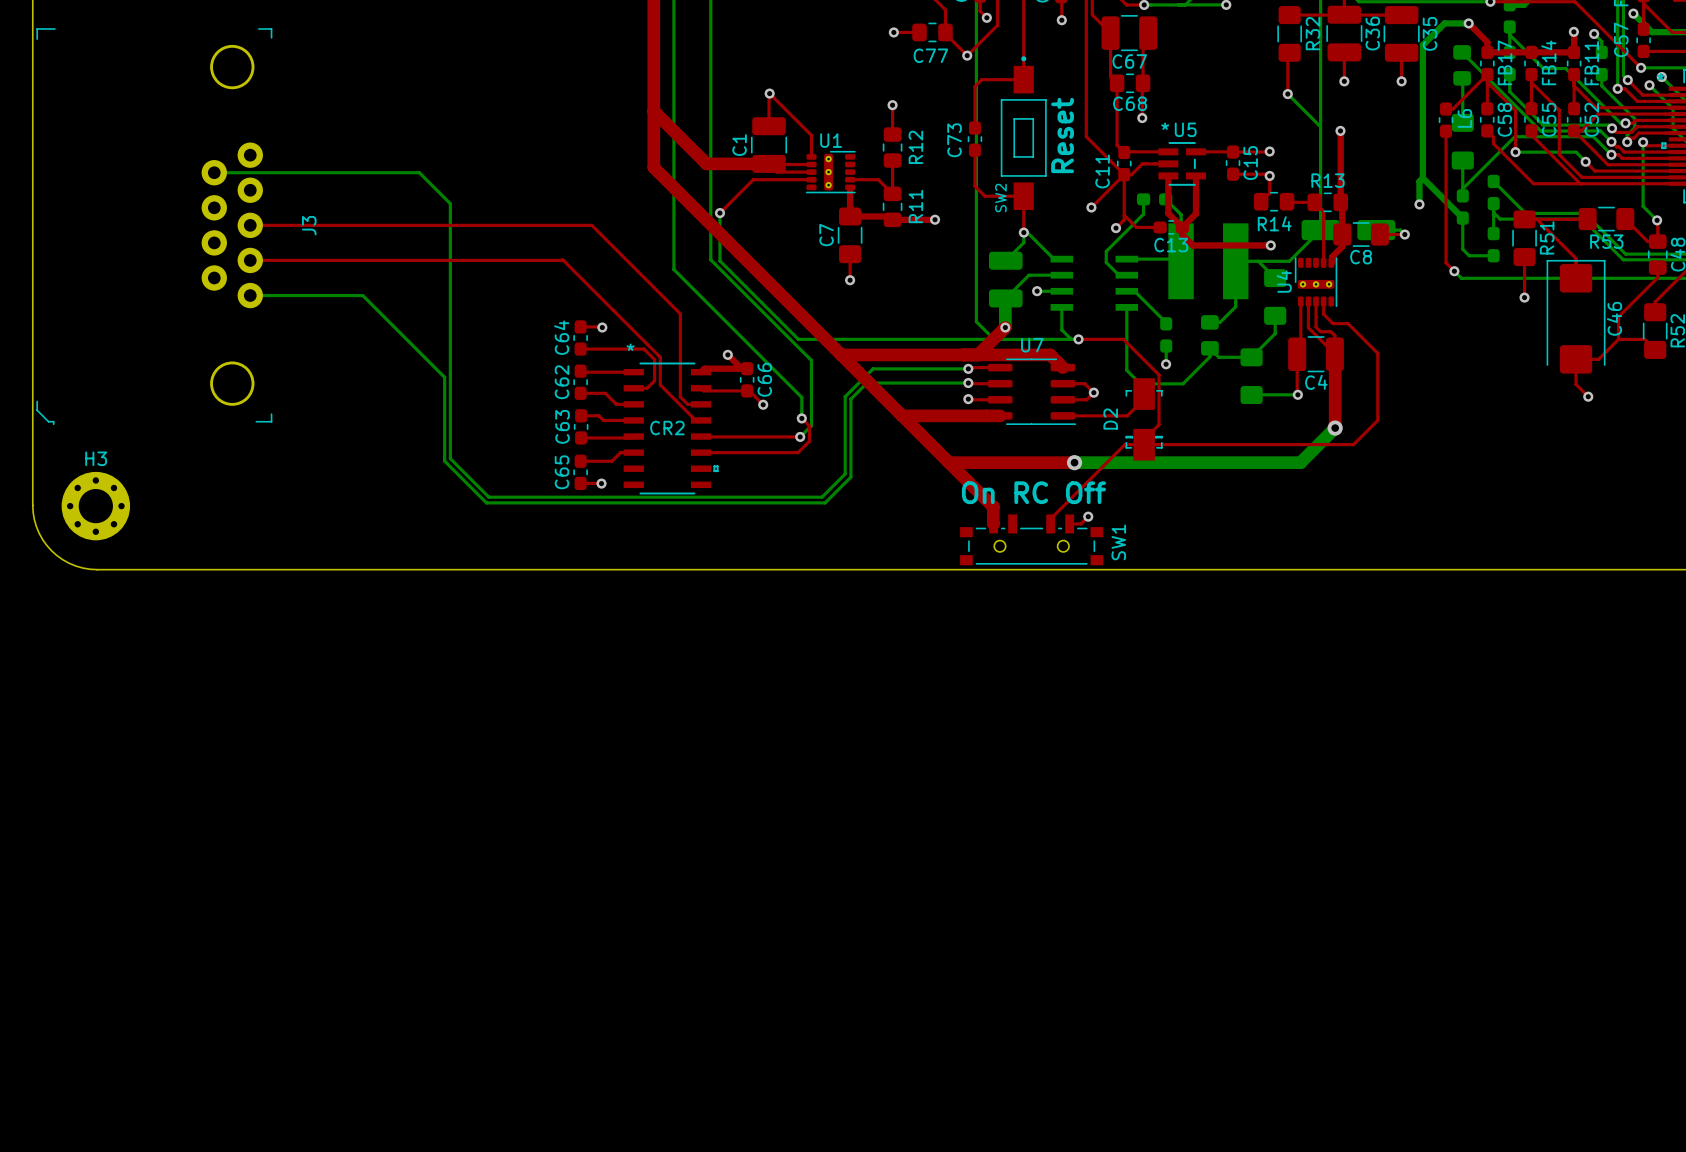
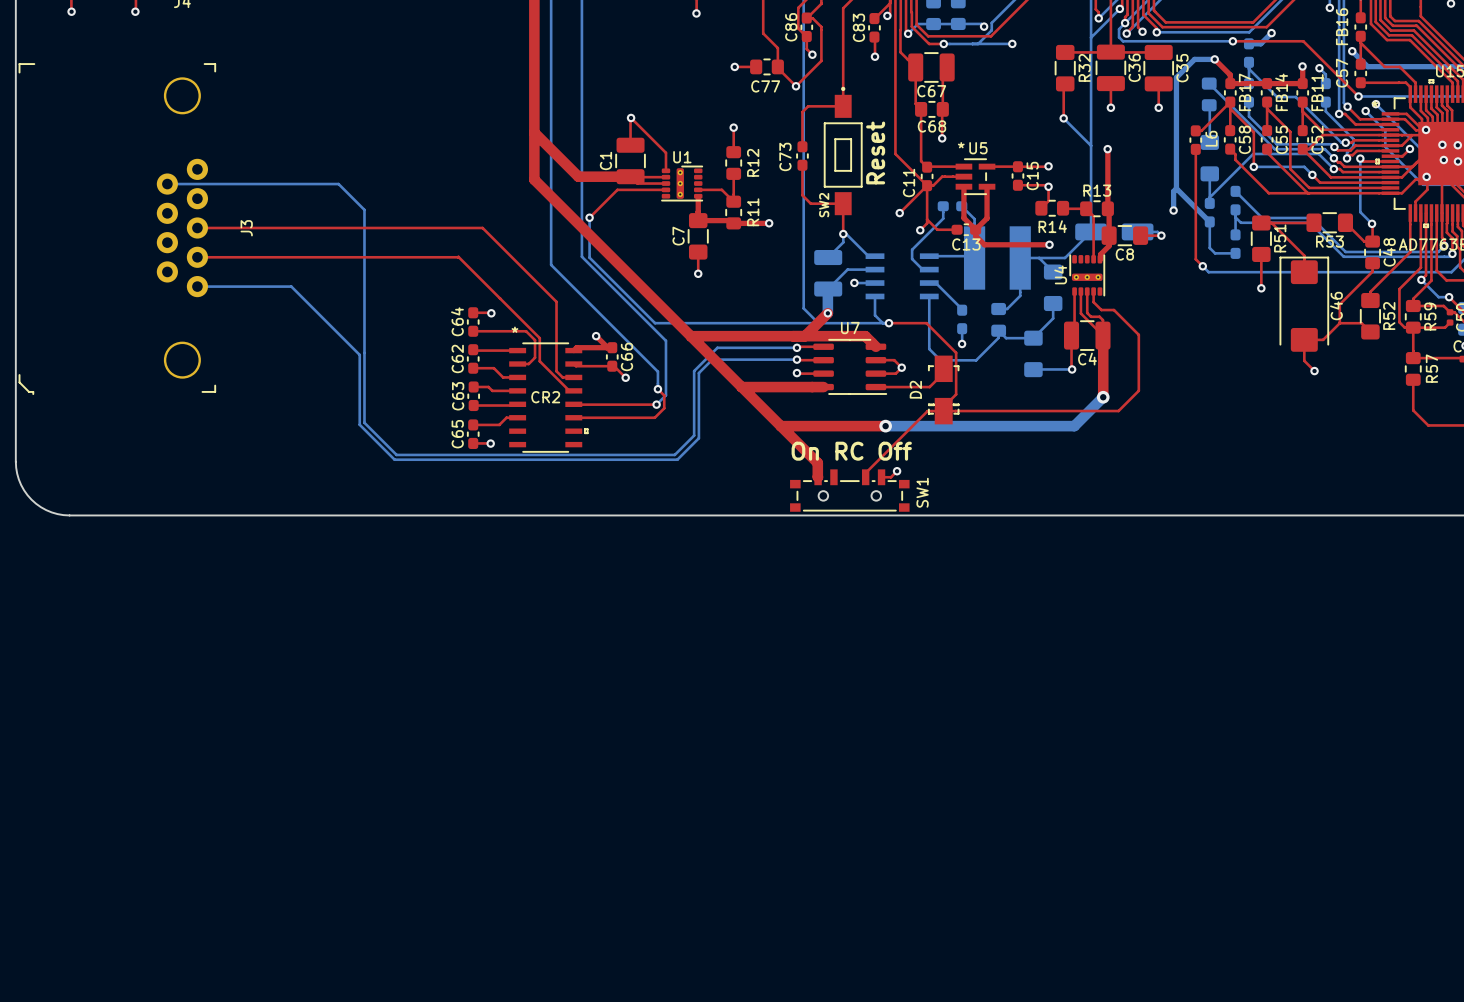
H3: (95, 506) -> none

